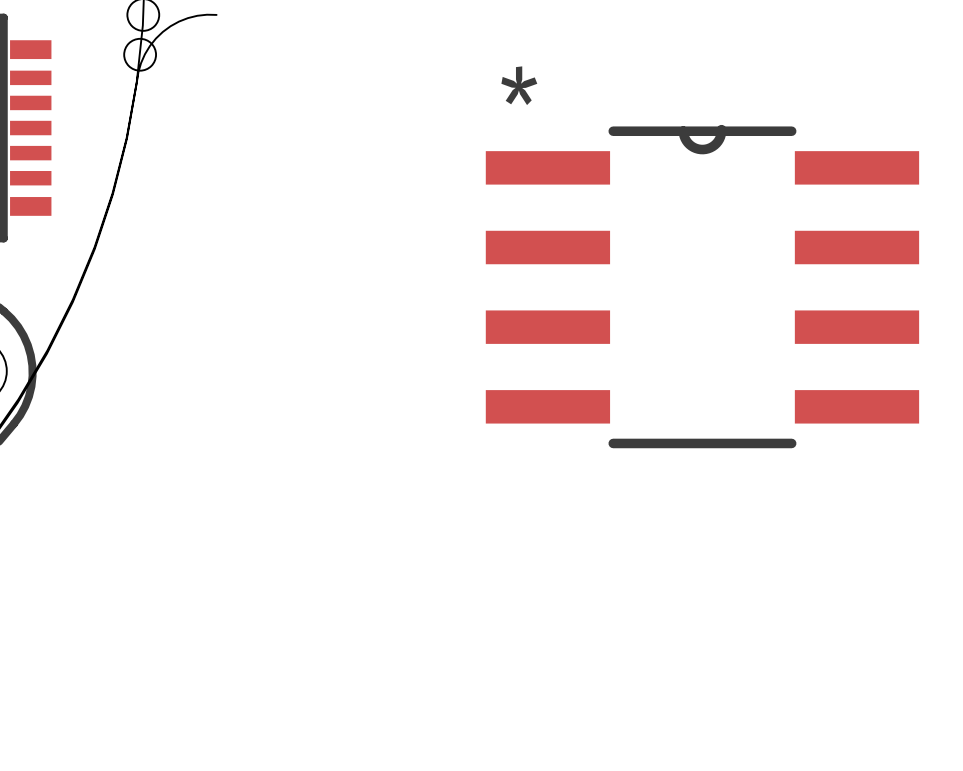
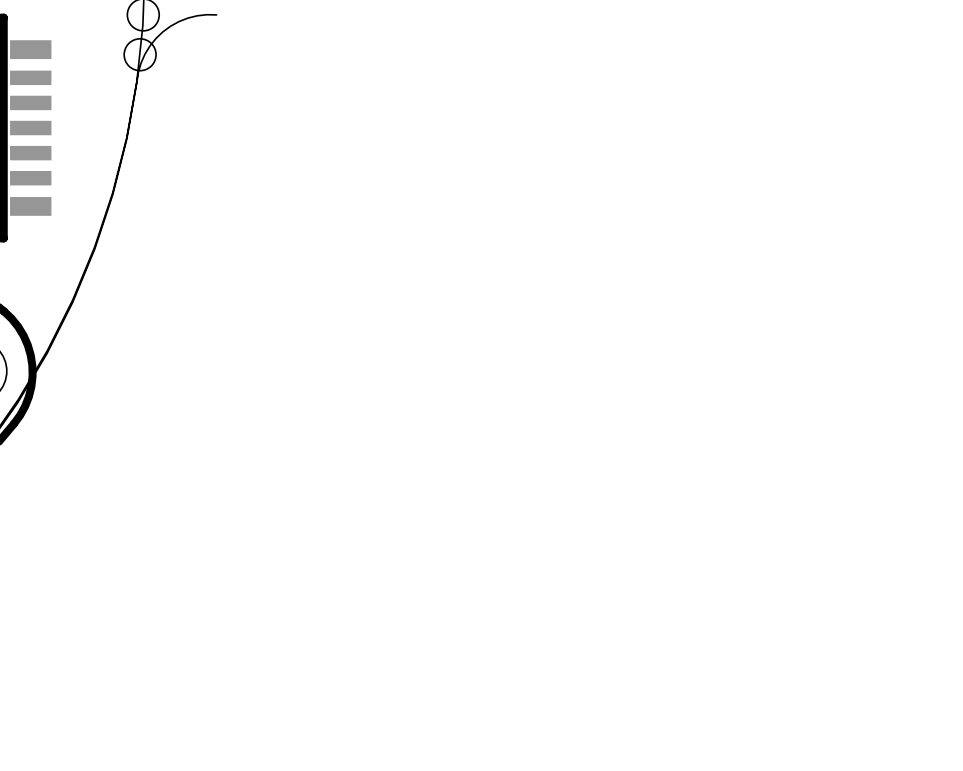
part: (702, 286) -> none

